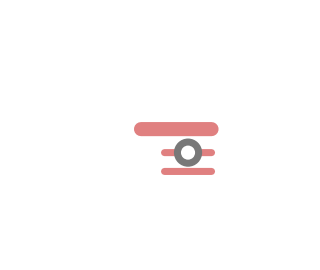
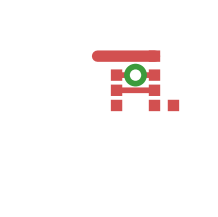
part: none -> (163, 80)
part: none -> (116, 90)

